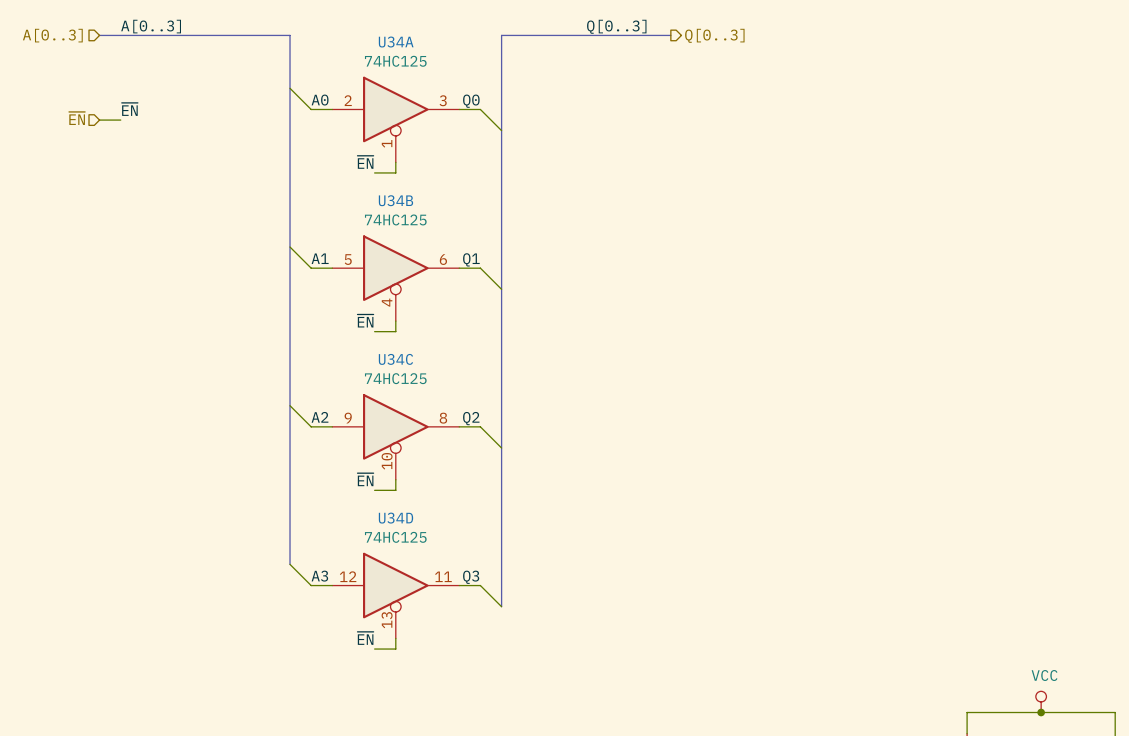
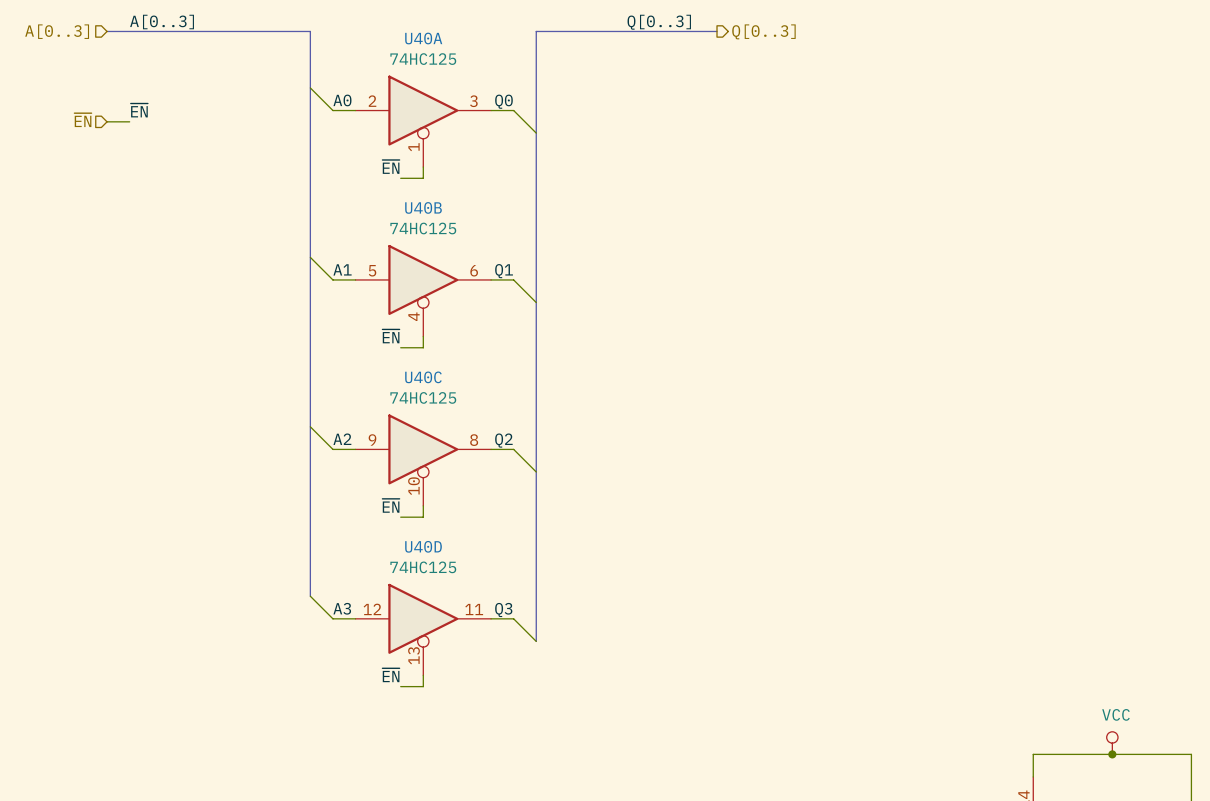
U34A name: U34A (396, 42) -> U40A (423, 38)
U34B name: U34B (395, 200) -> U40B (423, 207)
U34C name: U34C (395, 359) -> U40C (423, 377)
U34D name: U34D (395, 518) -> U40D (423, 546)

